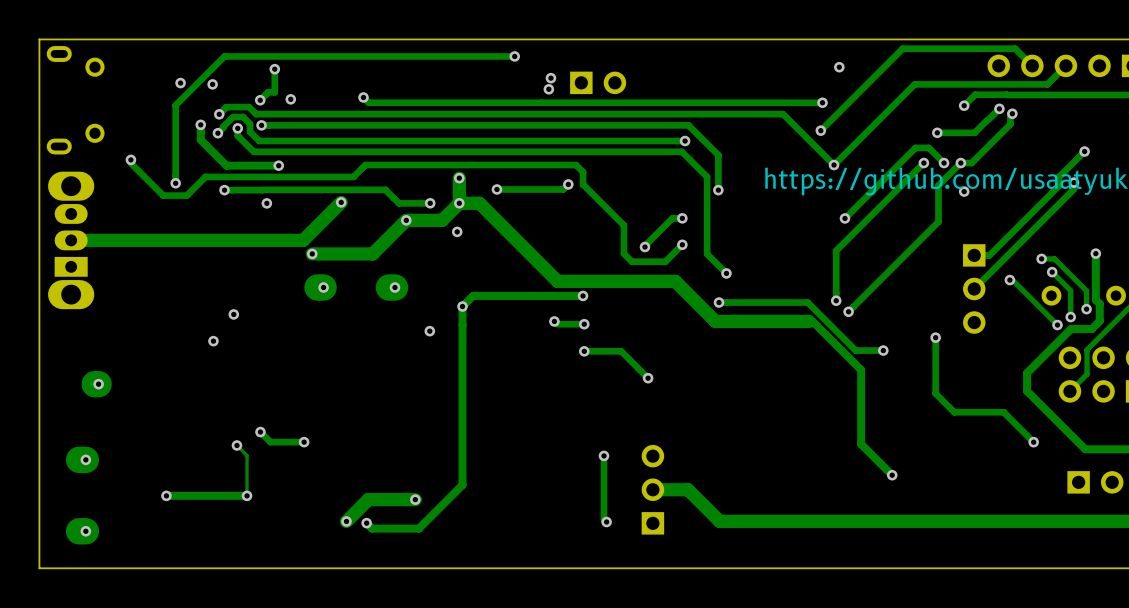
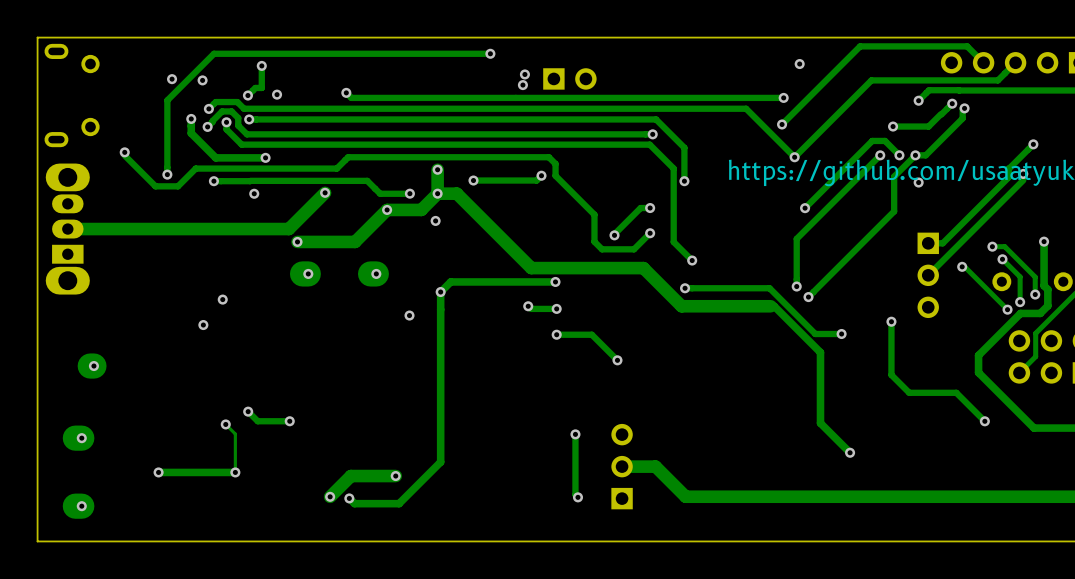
part: (1095, 482) -> none

